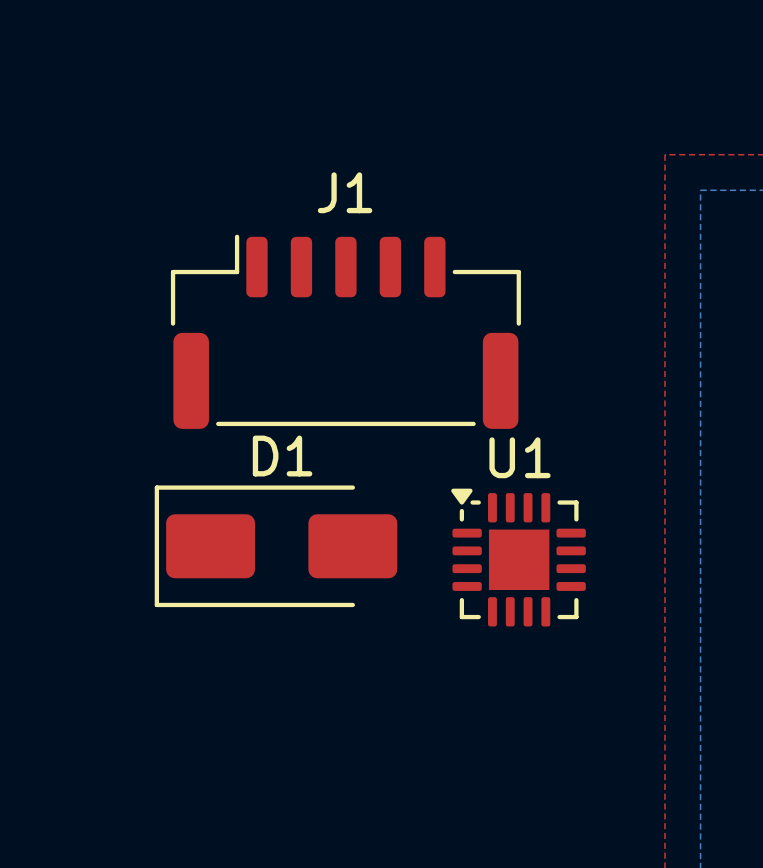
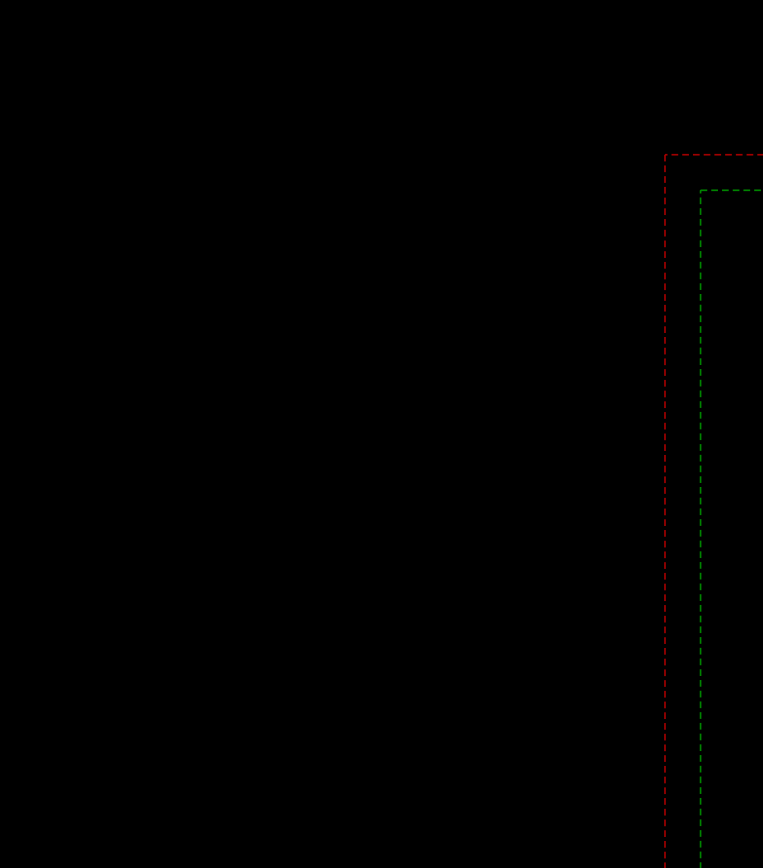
J1: (345, 331) -> none
D1: (276, 546) -> none
U1: (518, 557) -> none

